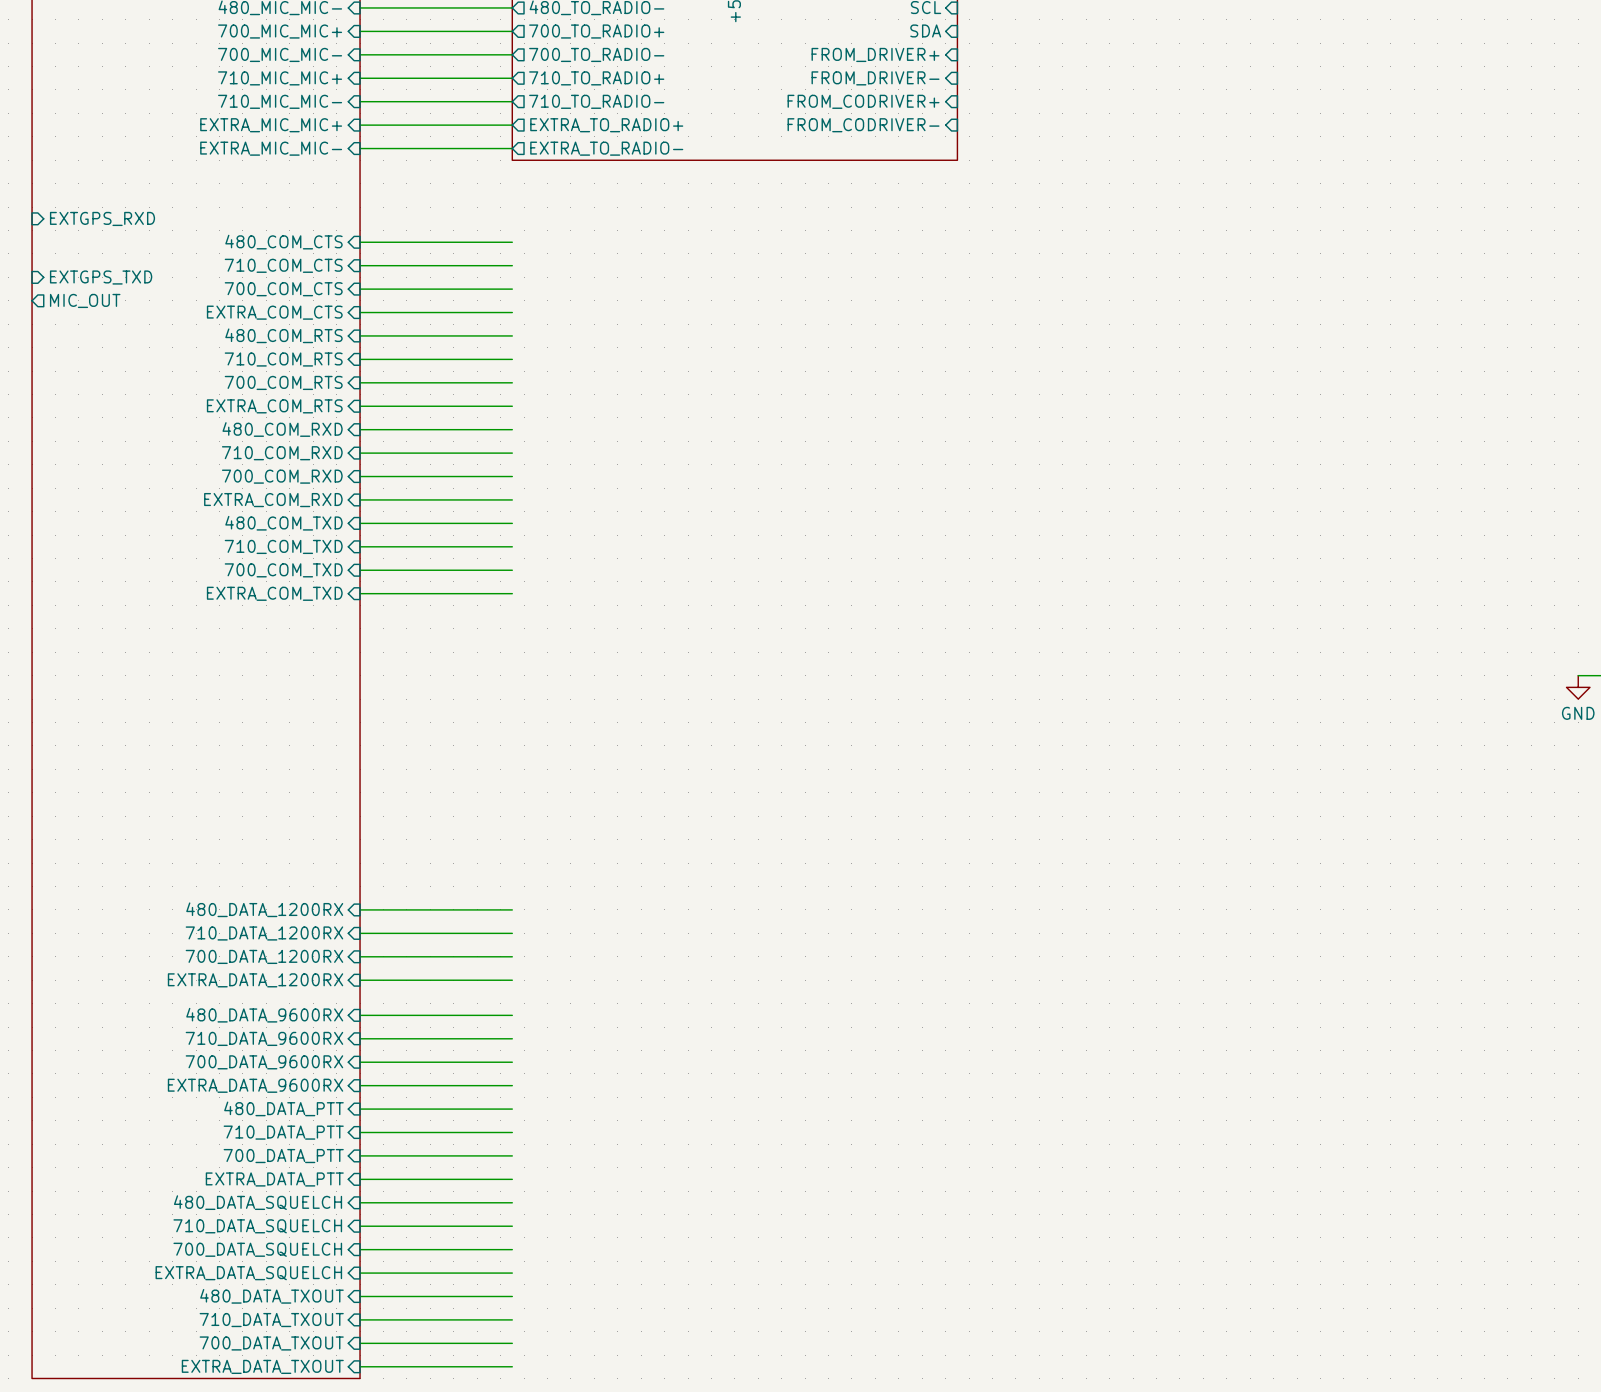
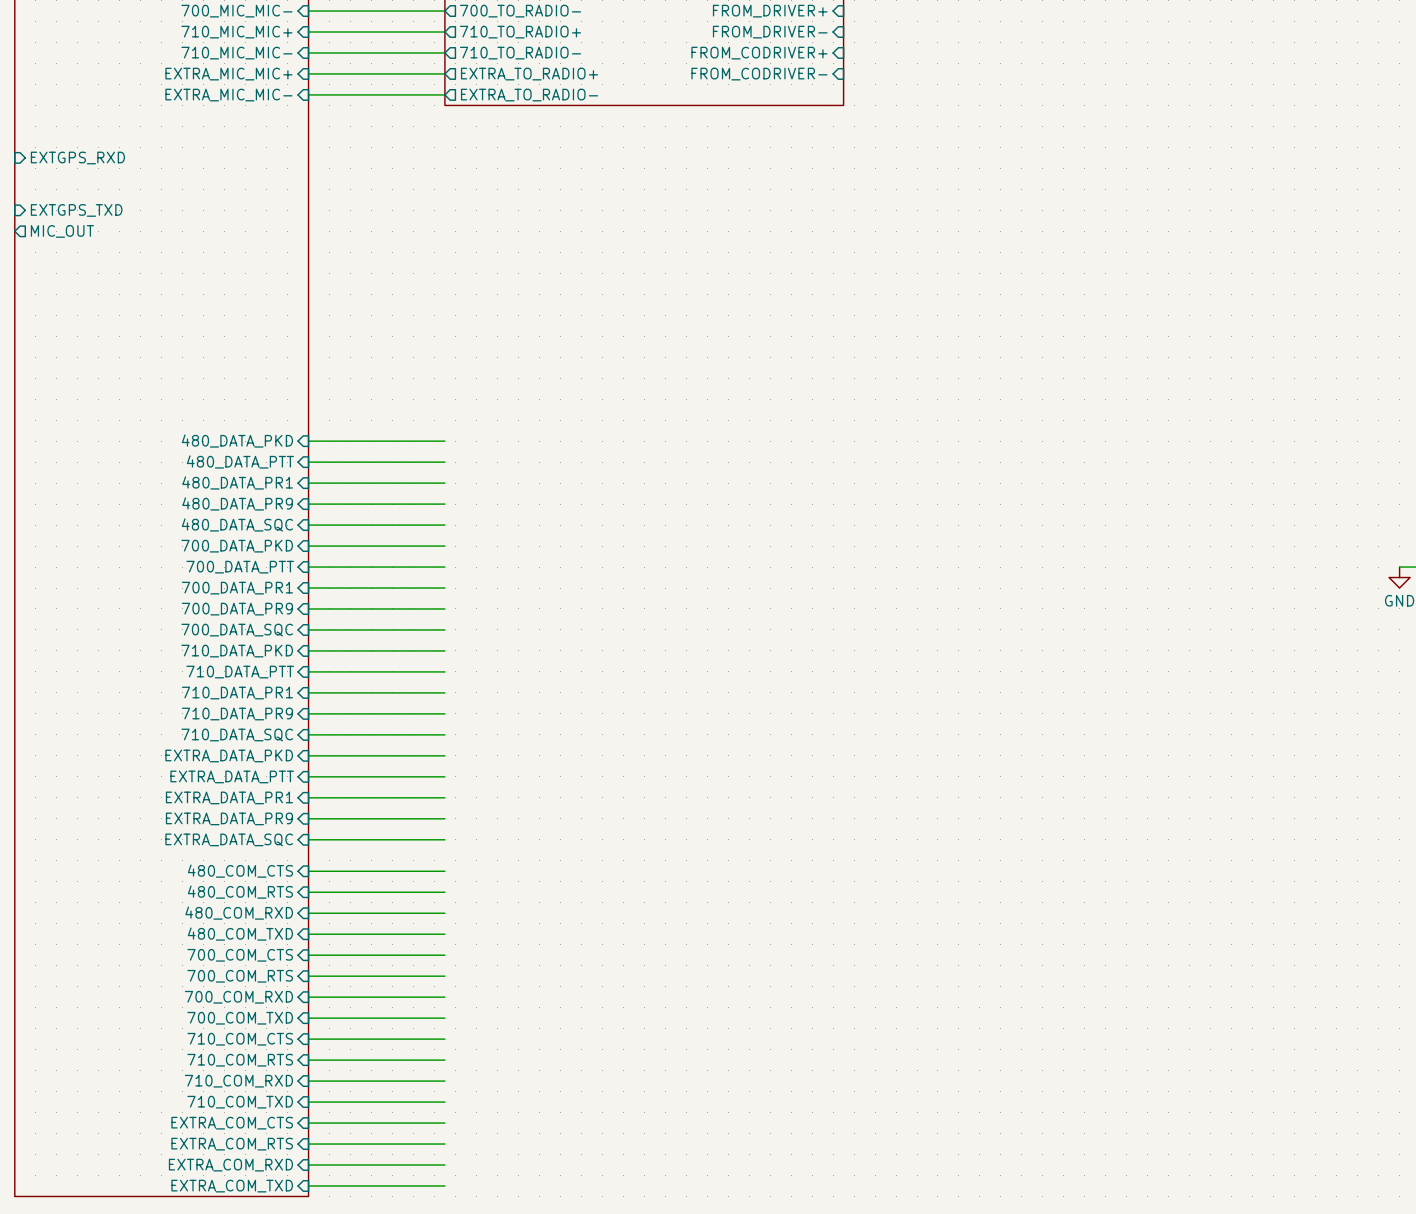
sheet pin: 480_COM_CTS (283, 242) -> none
wire: (360, 242) (512, 242) -> none
sheet pin: 710_COM_CTS (283, 265) -> none
wire: (360, 265) (512, 265) -> none
sheet pin: 700_COM_CTS (283, 289) -> none
wire: (360, 289) (512, 289) -> none
sheet pin: EXTRA_COM_CTS (274, 312) -> none
wire: (360, 312) (512, 312) -> (308, 441) (444, 441)
sheet pin: 480_COM_RTS (283, 335) -> none
wire: (360, 335) (512, 335) -> (308, 462) (444, 462)
sheet pin: 710_COM_RTS (283, 359) -> none
wire: (360, 359) (512, 359) -> (308, 483) (444, 483)
sheet pin: 700_COM_RTS (283, 382) -> none
wire: (360, 382) (512, 382) -> (308, 504) (444, 504)
sheet pin: EXTRA_COM_RTS (274, 406) -> none
wire: (360, 406) (512, 406) -> (308, 525) (444, 525)
sheet pin: 480_COM_RXD (282, 429) -> none
wire: (360, 429) (512, 429) -> (308, 546) (444, 546)
sheet pin: 710_COM_RXD (282, 453) -> none
wire: (360, 453) (512, 453) -> (308, 567) (444, 567)
sheet pin: 700_COM_RXD (282, 476) -> none
wire: (360, 476) (512, 476) -> (308, 588) (444, 588)
wire: (360, 499) (512, 499) -> (308, 608) (444, 608)
sheet pin: EXTRA_COM_RXD (273, 500) -> none
sheet pin: 480_COM_TXD (283, 523) -> none
wire: (360, 523) (512, 523) -> (308, 629) (444, 629)
sheet pin: none -> 480_DATA_PKD (237, 441)
sheet pin: 710_COM_TXD (283, 546) -> none
wire: (360, 546) (512, 546) -> (308, 650) (444, 650)
sheet pin: none -> 480_DATA_PTT (240, 461)
sheet pin: 700_COM_TXD (283, 570) -> none
wire: (360, 570) (512, 570) -> (308, 671) (444, 671)
sheet pin: none -> 480_DATA_PR1 (237, 482)
sheet pin: EXTRA_COM_TXD (274, 593) -> none
wire: (360, 593) (512, 593) -> (308, 692) (444, 692)
sheet pin: none -> 480_DATA_PR9 (237, 503)
sheet pin: none -> 480_DATA_SQC (237, 524)
sheet pin: none -> 700_DATA_PKD (237, 546)
sheet pin: none -> 700_DATA_PTT (240, 567)
sheet pin: none -> 700_DATA_PR1 (237, 588)
sheet pin: none -> 700_DATA_PR9 (237, 609)
sheet pin: none -> 700_DATA_SQC (237, 630)
sheet pin: none -> 710_DATA_PKD (237, 651)
sheet pin: none -> 710_DATA_PTT (240, 672)
sheet pin: none -> 710_DATA_PR1 (237, 693)
sheet pin: none -> 710_DATA_PR9 (237, 714)
wire: none -> (308, 713) (444, 713)
sheet pin: none -> 710_DATA_SQC (237, 734)
wire: none -> (308, 734) (444, 734)
sheet pin: none -> EXTRA_DATA_PKD (229, 755)
wire: none -> (308, 755) (444, 755)
sheet pin: 480_DATA_1200RX (264, 909) -> EXTRA_DATA_PTT (232, 776)
sheet pin: 710_DATA_1200RX (264, 933) -> EXTRA_DATA_PR1 (229, 797)
sheet pin: 700_DATA_1200RX (264, 956) -> EXTRA_DATA_PR9 (229, 818)
sheet pin: EXTRA_DATA_1200RX (255, 980) -> EXTRA_DATA_SQC (229, 839)
sheet pin: 480_DATA_9600RX (264, 1015) -> 480_COM_CTS (240, 871)
sheet pin: 710_DATA_9600RX (264, 1038) -> 480_COM_RTS (240, 892)
sheet pin: 700_DATA_9600RX (264, 1062) -> 480_COM_RXD (239, 913)
sheet pin: EXTRA_DATA_9600RX (255, 1085) -> 480_COM_TXD (240, 934)
sheet pin: 480_DATA_PTT (283, 1108) -> 700_COM_CTS (240, 955)
sheet pin: 710_DATA_PTT (283, 1132) -> 700_COM_RTS (240, 976)
sheet pin: 700_DATA_PTT (283, 1156) -> 700_COM_RXD (238, 997)
sheet pin: EXTRA_DATA_PTT (274, 1179) -> 700_COM_TXD (240, 1018)
sheet pin: 480_DATA_SQUELCH (258, 1202) -> 710_COM_CTS (240, 1039)
sheet pin: 710_DATA_SQUELCH (257, 1226) -> 710_COM_RTS (240, 1060)
sheet pin: 700_DATA_SQUELCH (257, 1249) -> 710_COM_RXD (238, 1081)
sheet pin: EXTRA_DATA_SQUELCH (248, 1273) -> 710_COM_TXD (240, 1102)
sheet pin: 480_DATA_TXOUT (271, 1296) -> EXTRA_COM_CTS (232, 1123)
sheet pin: 710_DATA_TXOUT (271, 1320) -> EXTRA_COM_RTS (232, 1144)
sheet pin: 700_DATA_TXOUT (271, 1343) -> EXTRA_COM_RXD (230, 1165)
sheet pin: EXTRA_DATA_TXOUT (262, 1366) -> EXTRA_COM_TXD (232, 1186)

